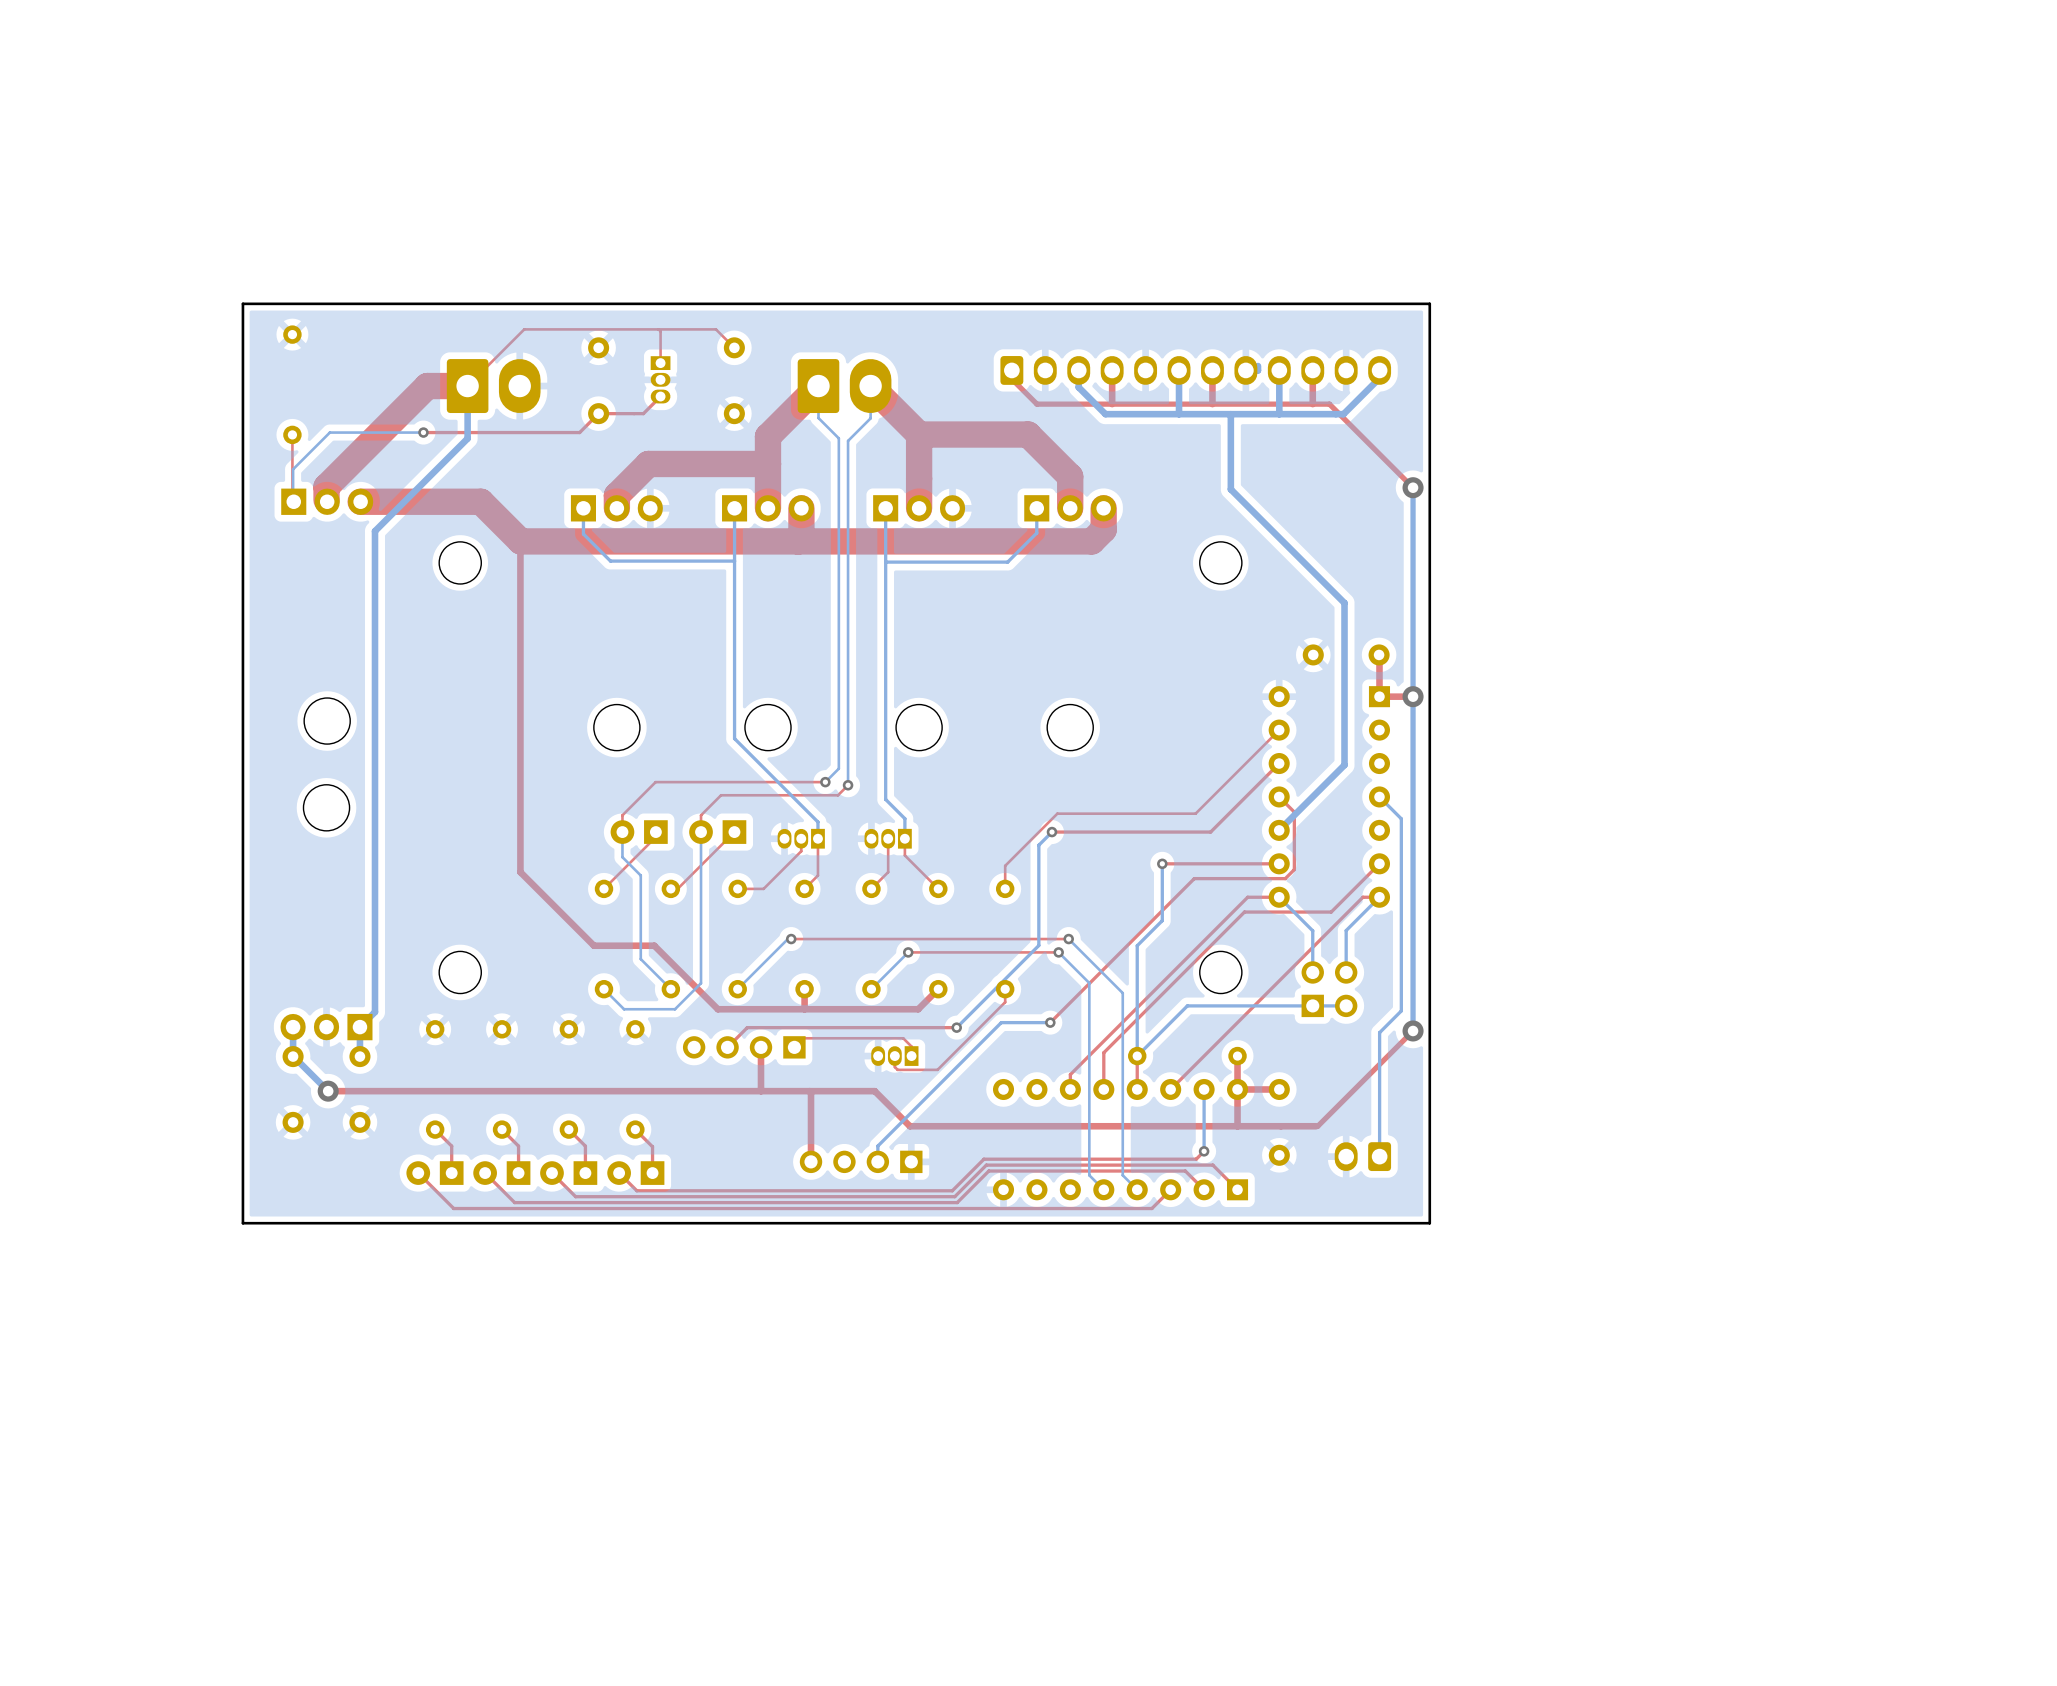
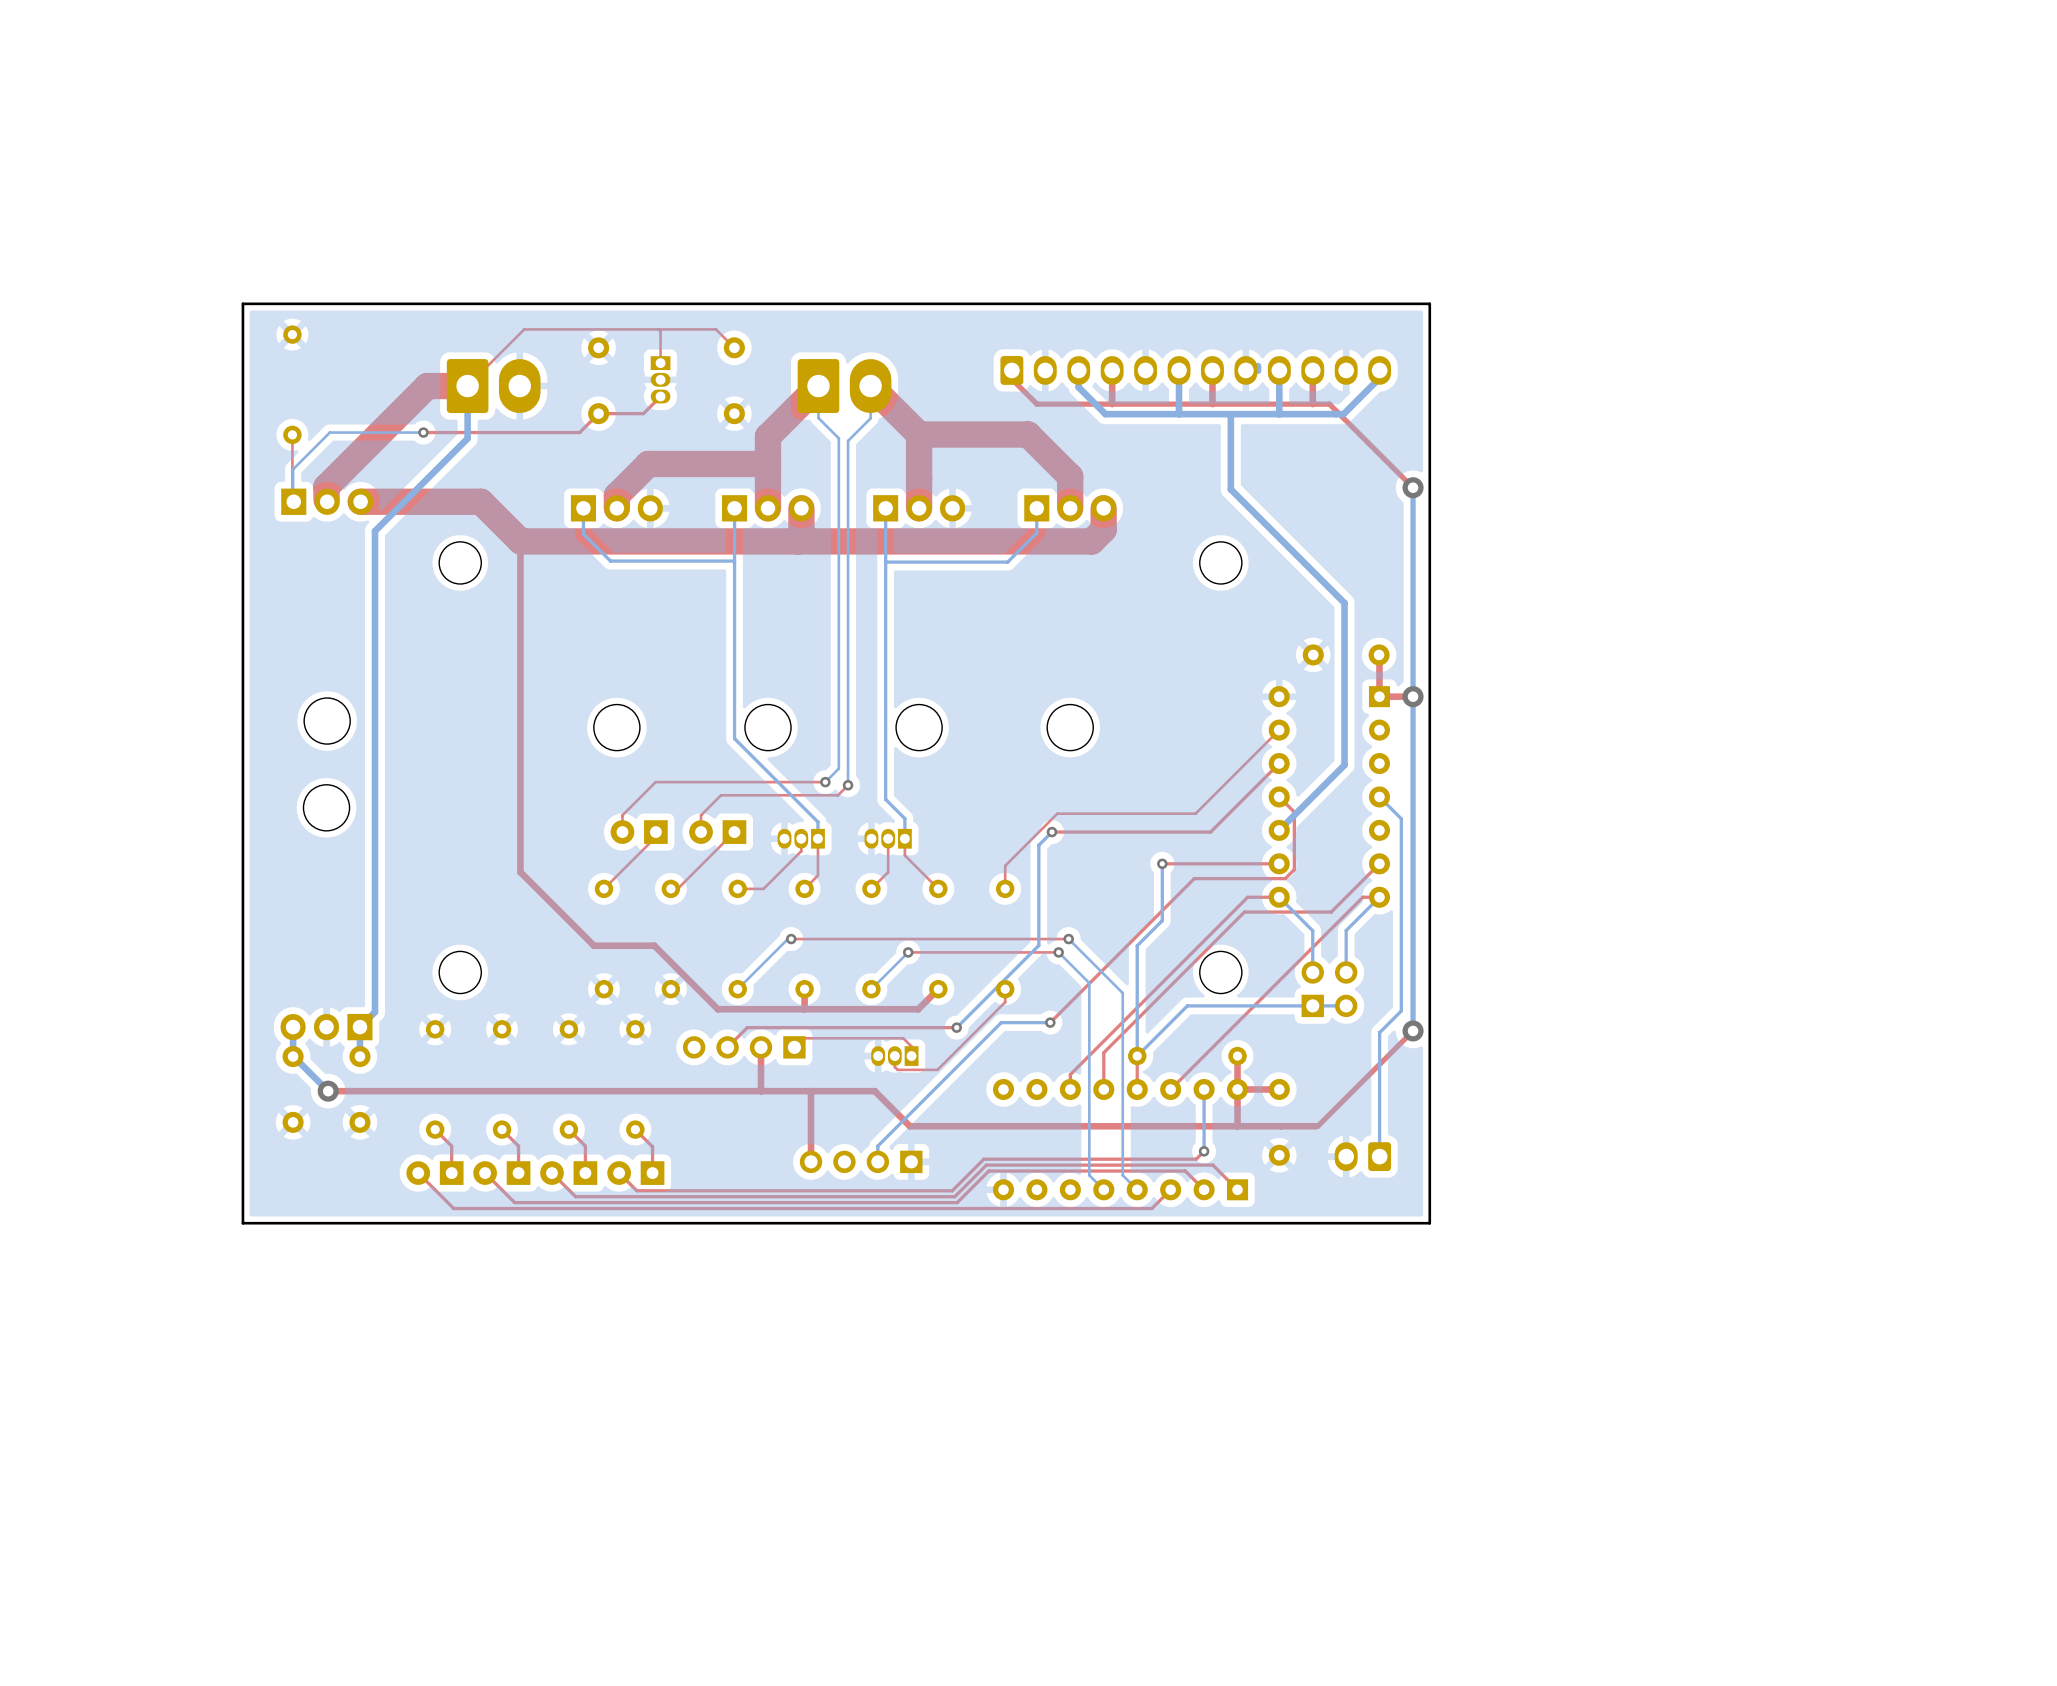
bottom track: (622, 832) (622, 857) (640, 875) (640, 959) (670, 989) -> none
bottom track: (701, 832) (701, 983) (674, 1009) (624, 1009) (604, 989) -> none

